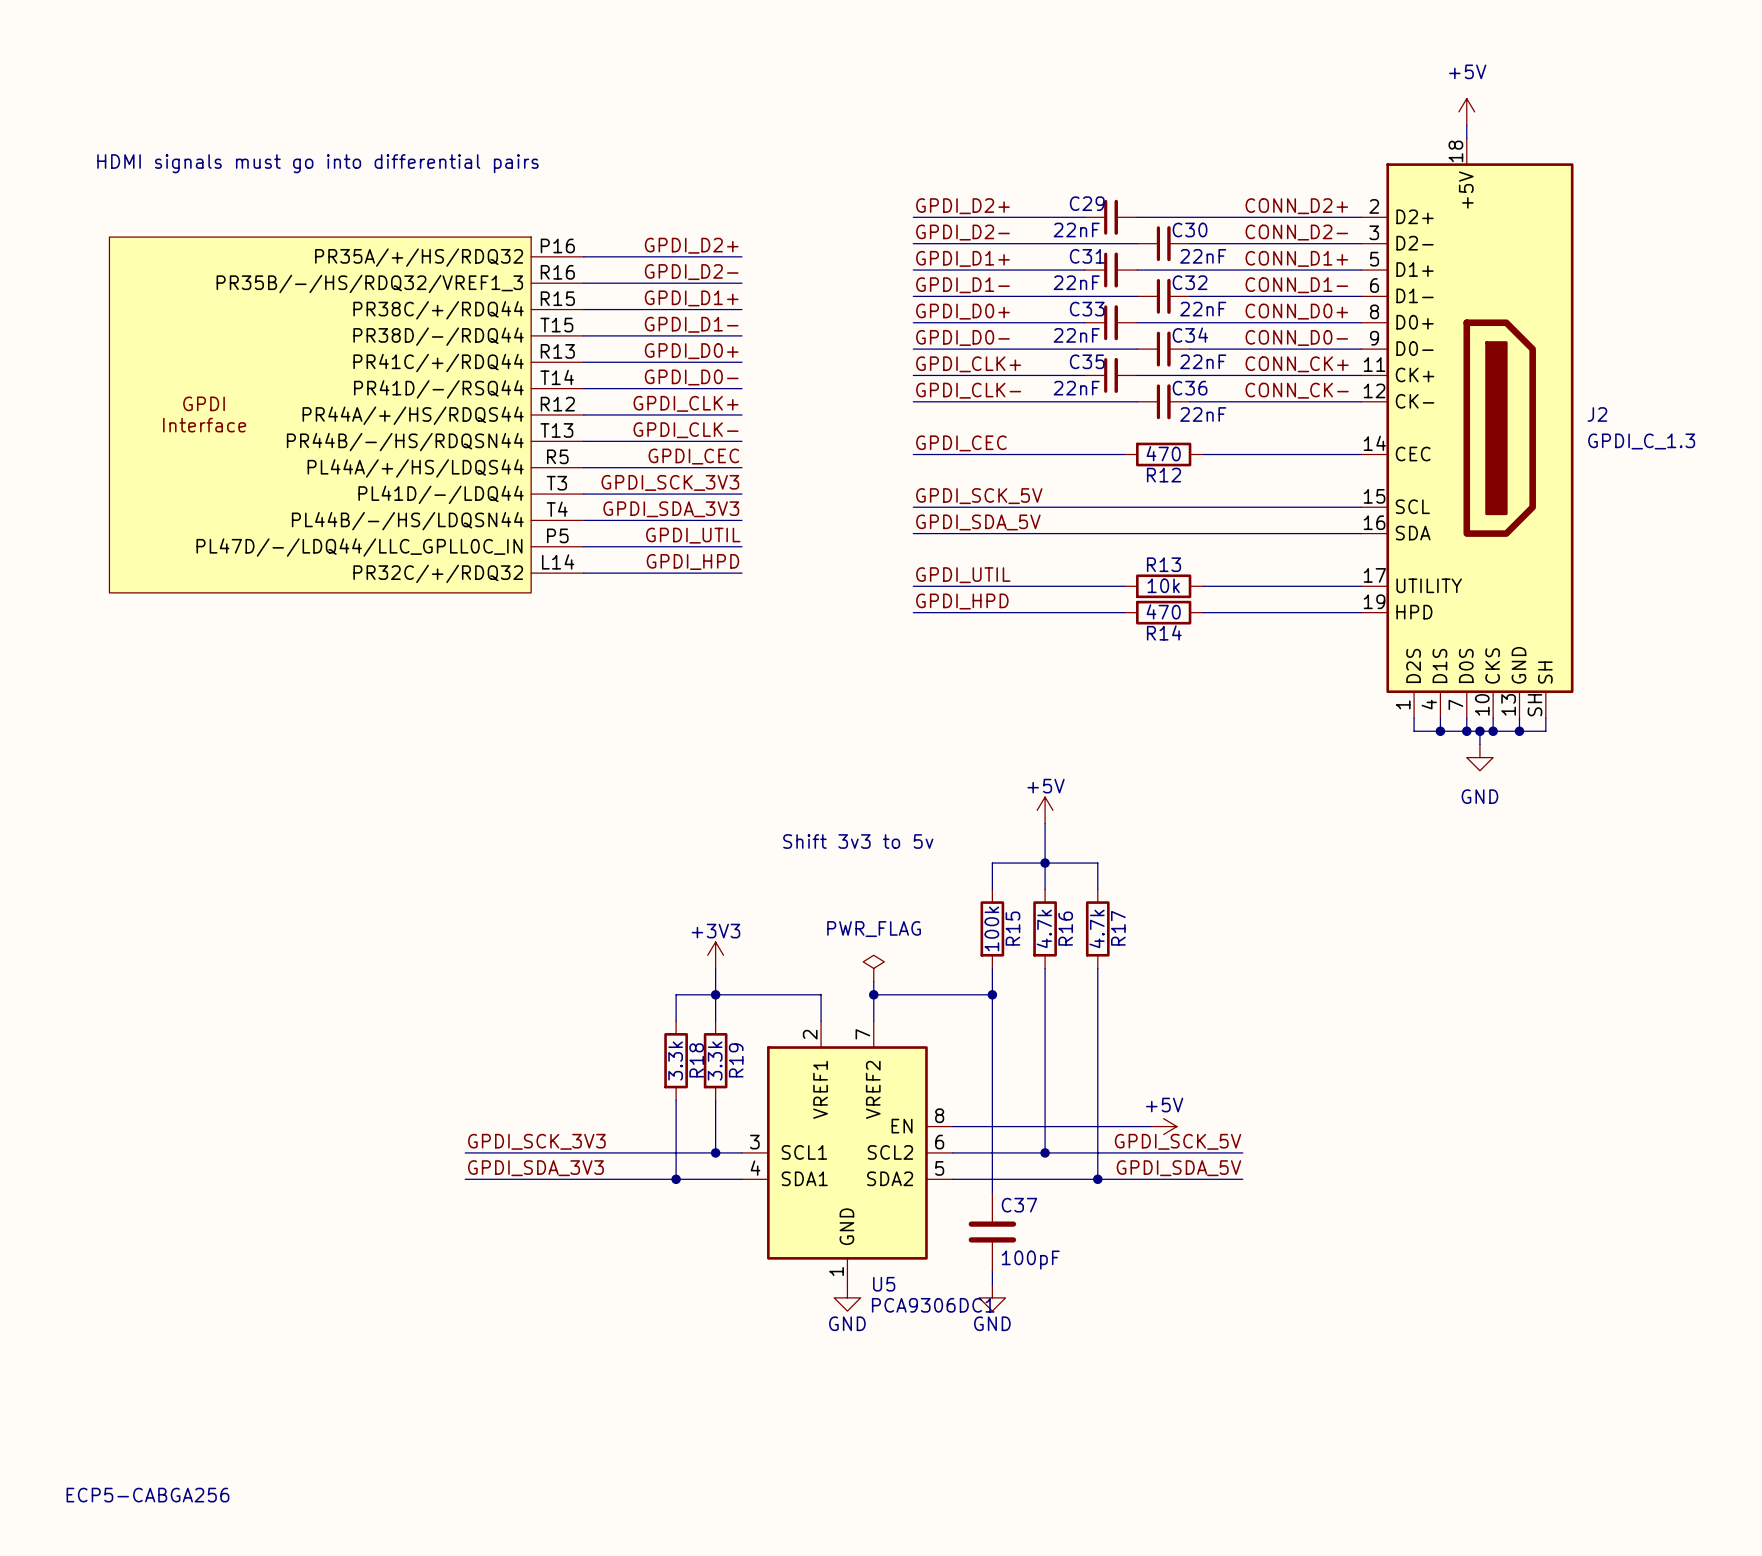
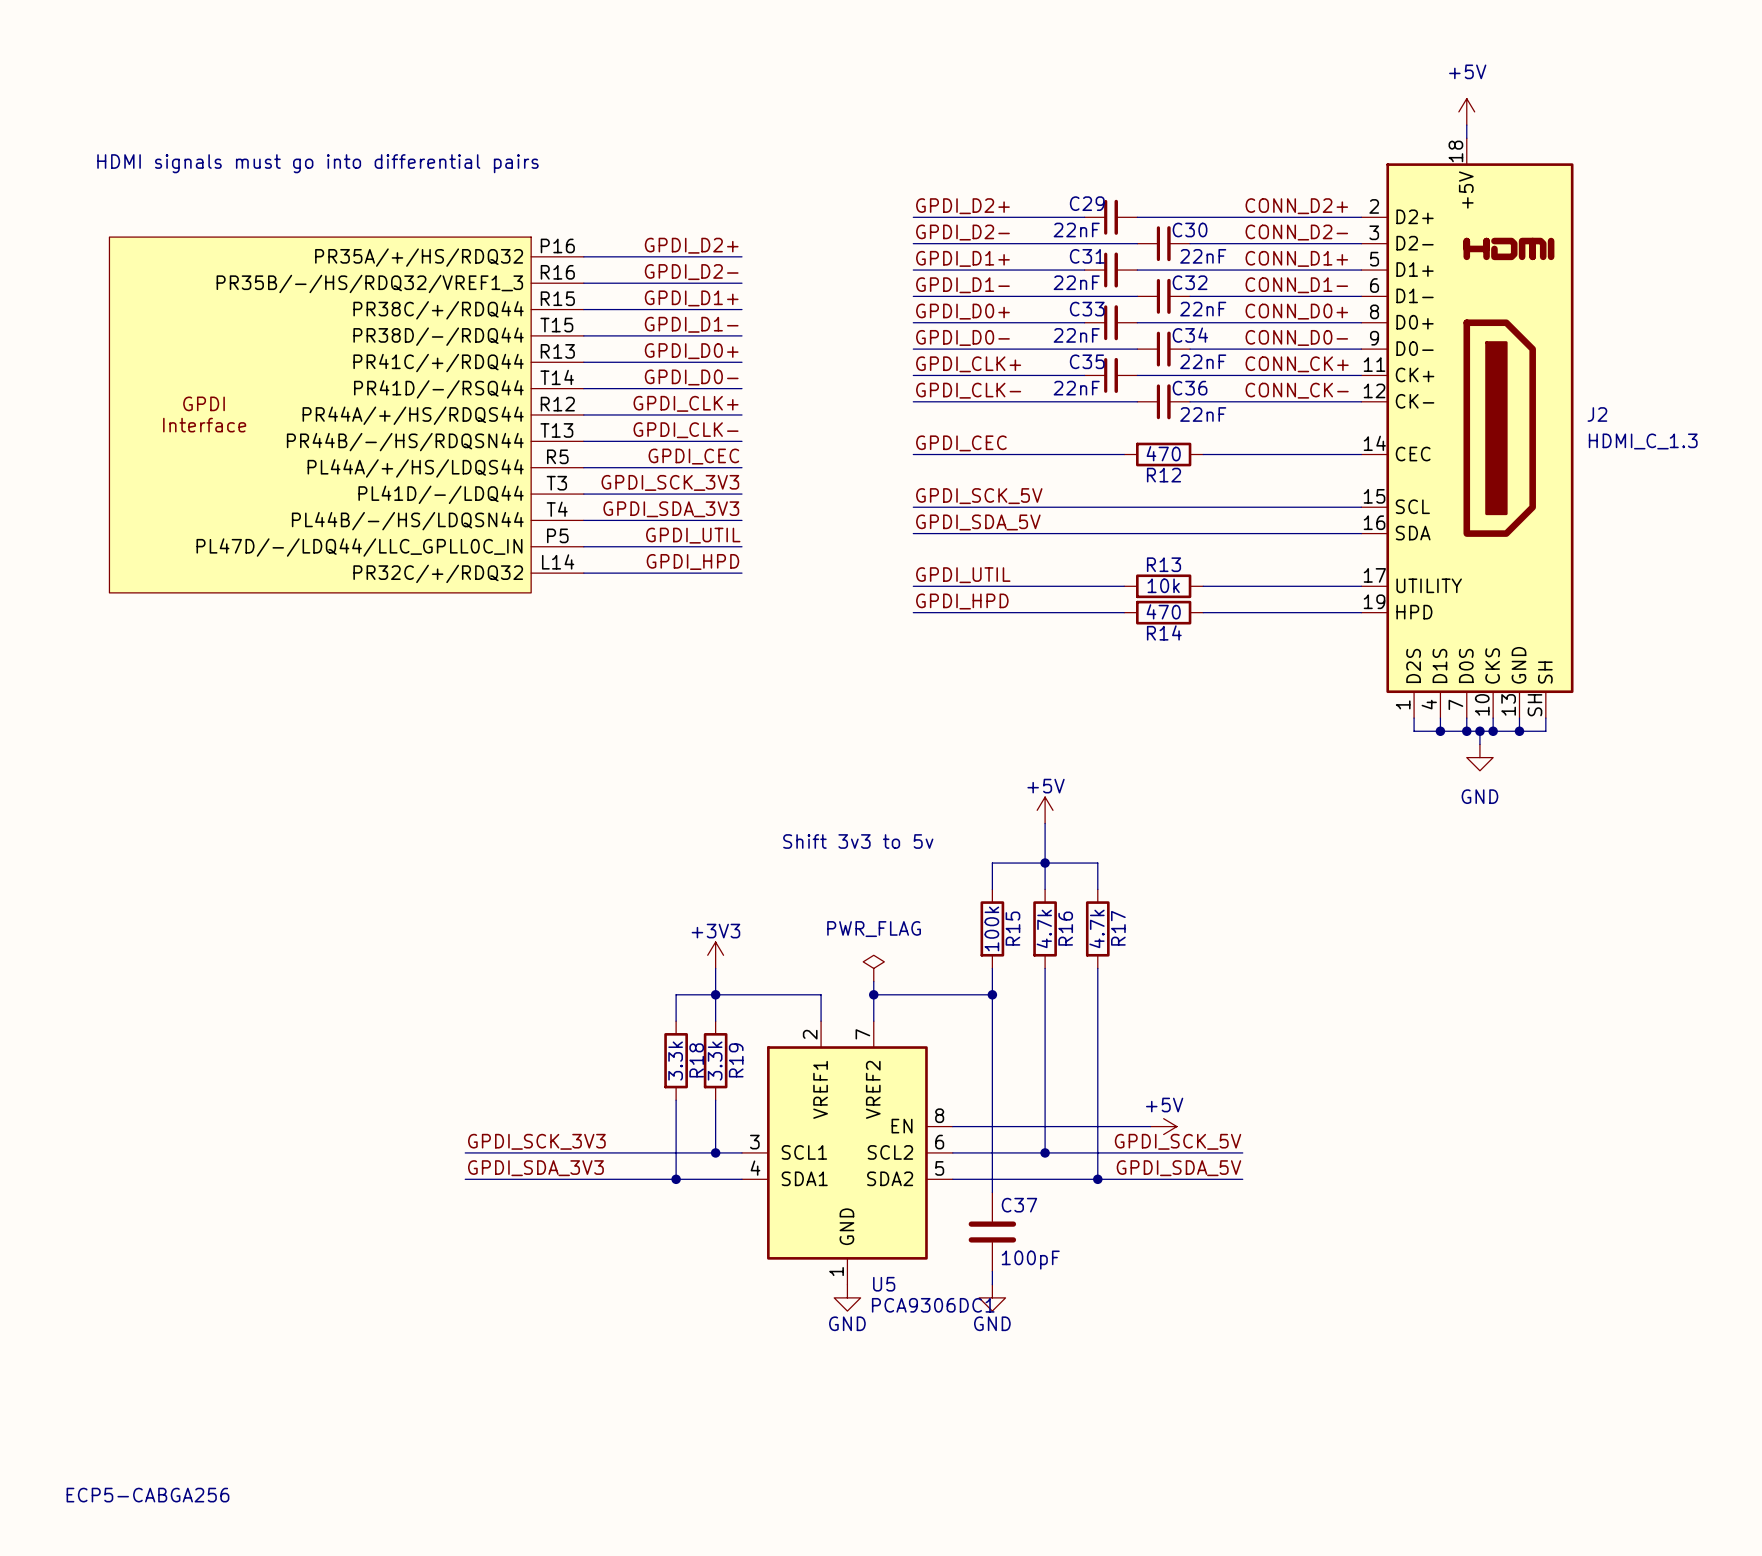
J2 symbol: [1361, 138, 1574, 719] -> [1361, 138, 1574, 719]
J2 value: GPDI_C_1.3 (1641, 441) -> HDMI_C_1.3 (1643, 441)

